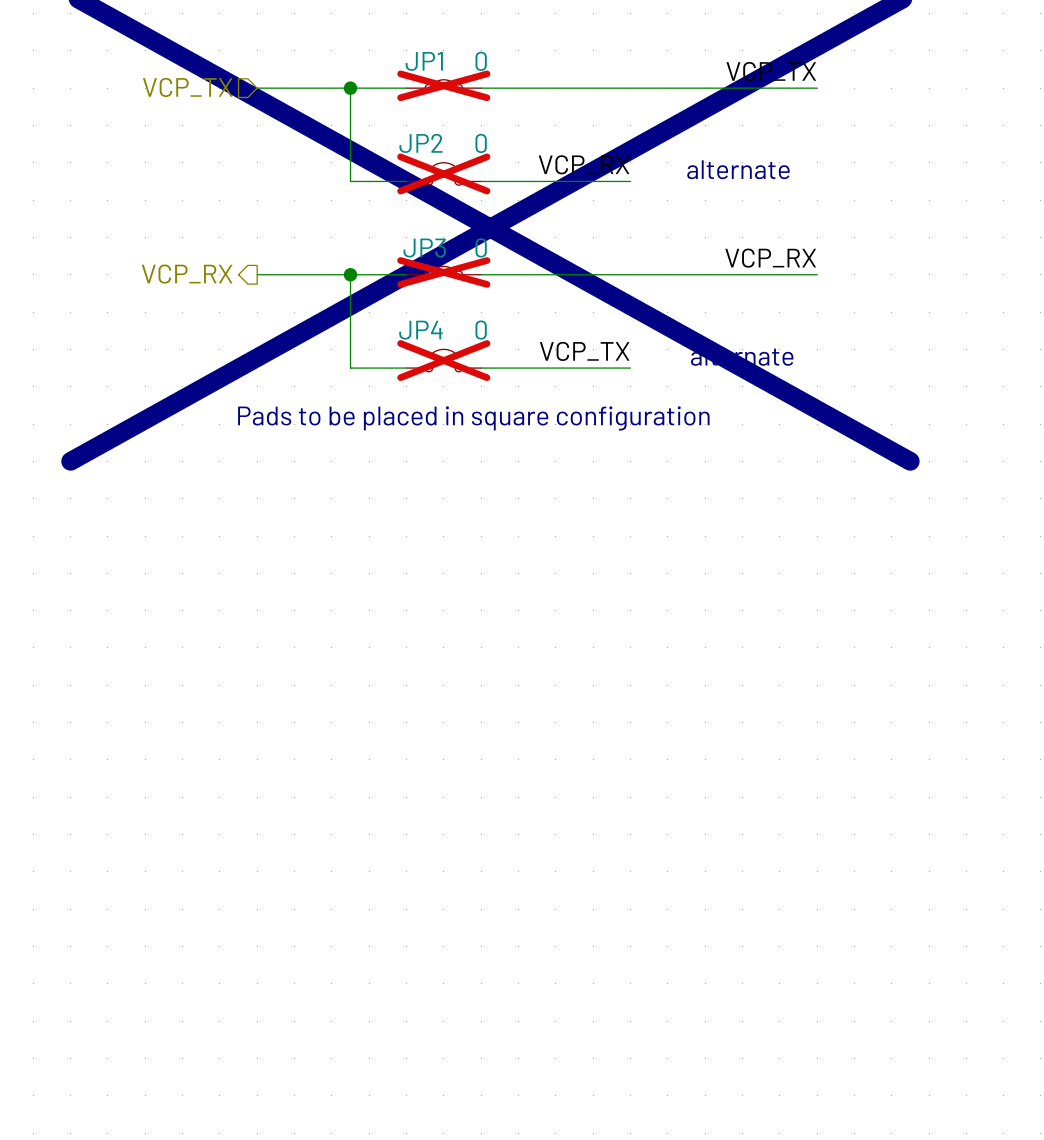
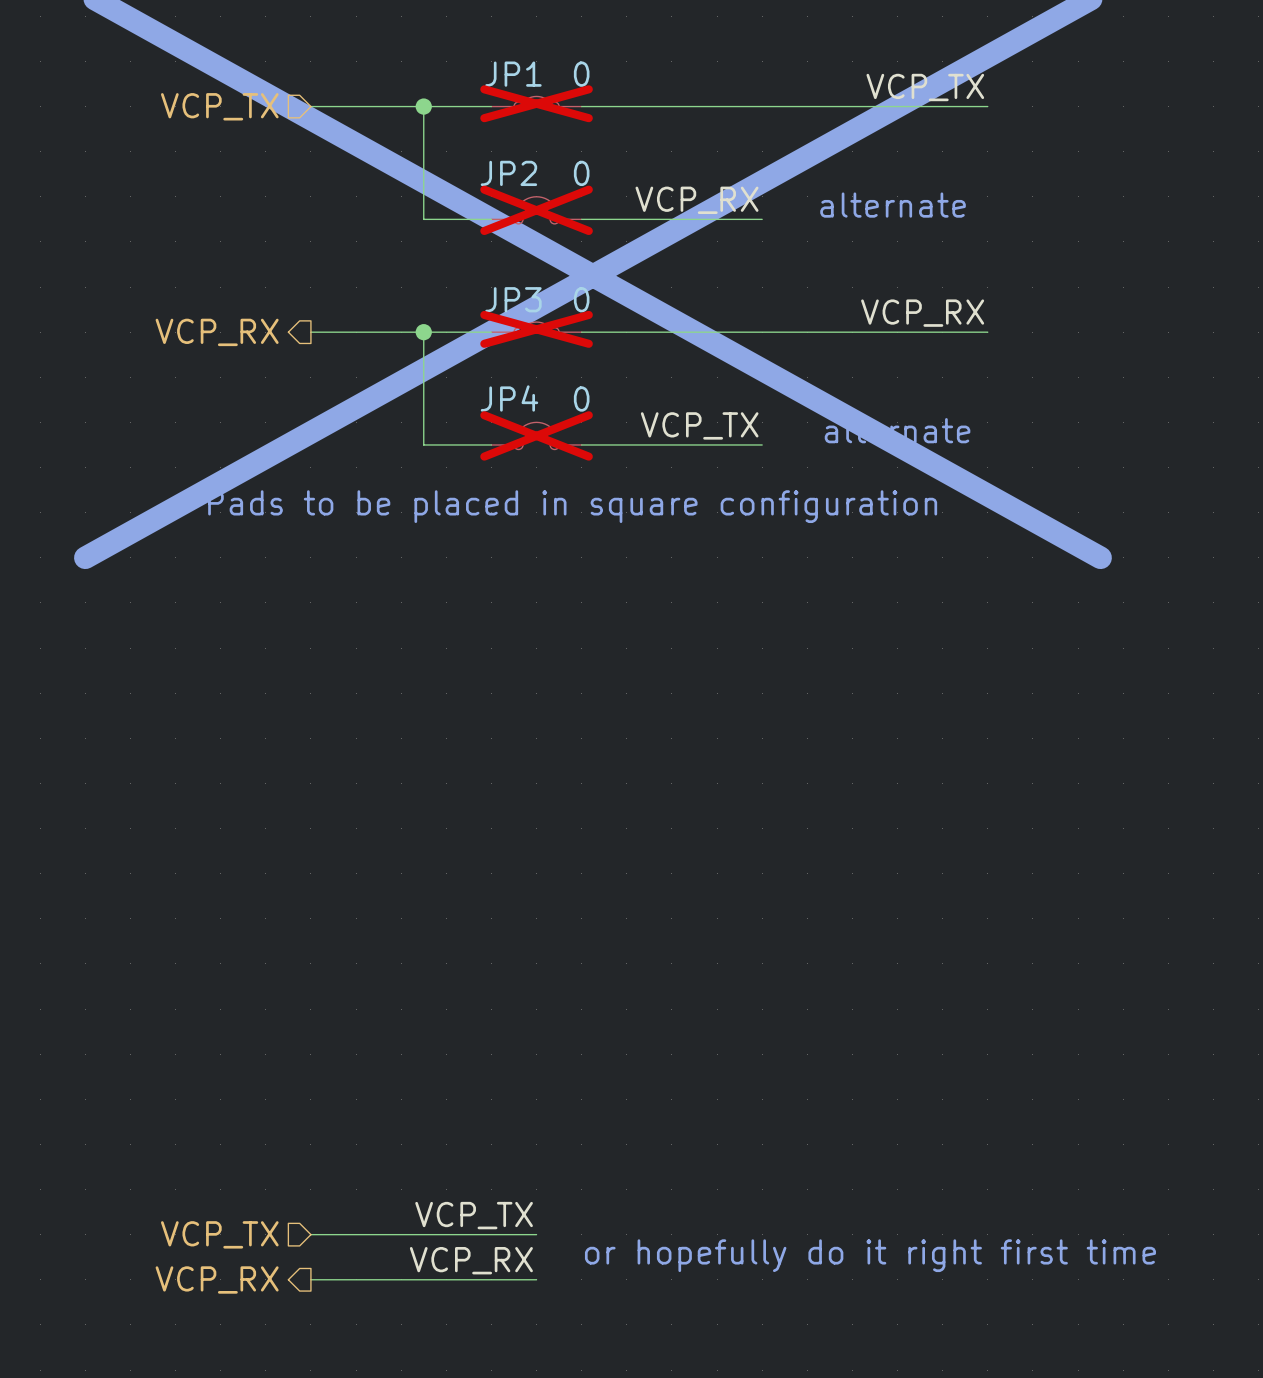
label: none -> VCP_TX (474, 1215)
hierarchical label: none -> VCP_TX (219, 1234)
wire: none -> (310, 1234) (536, 1234)
text: none -> or hopefully do it right first time (870, 1255)
label: none -> VCP_RX (471, 1260)
hierarchical label: none -> VCP_RX (217, 1279)
wire: none -> (310, 1279) (536, 1279)

